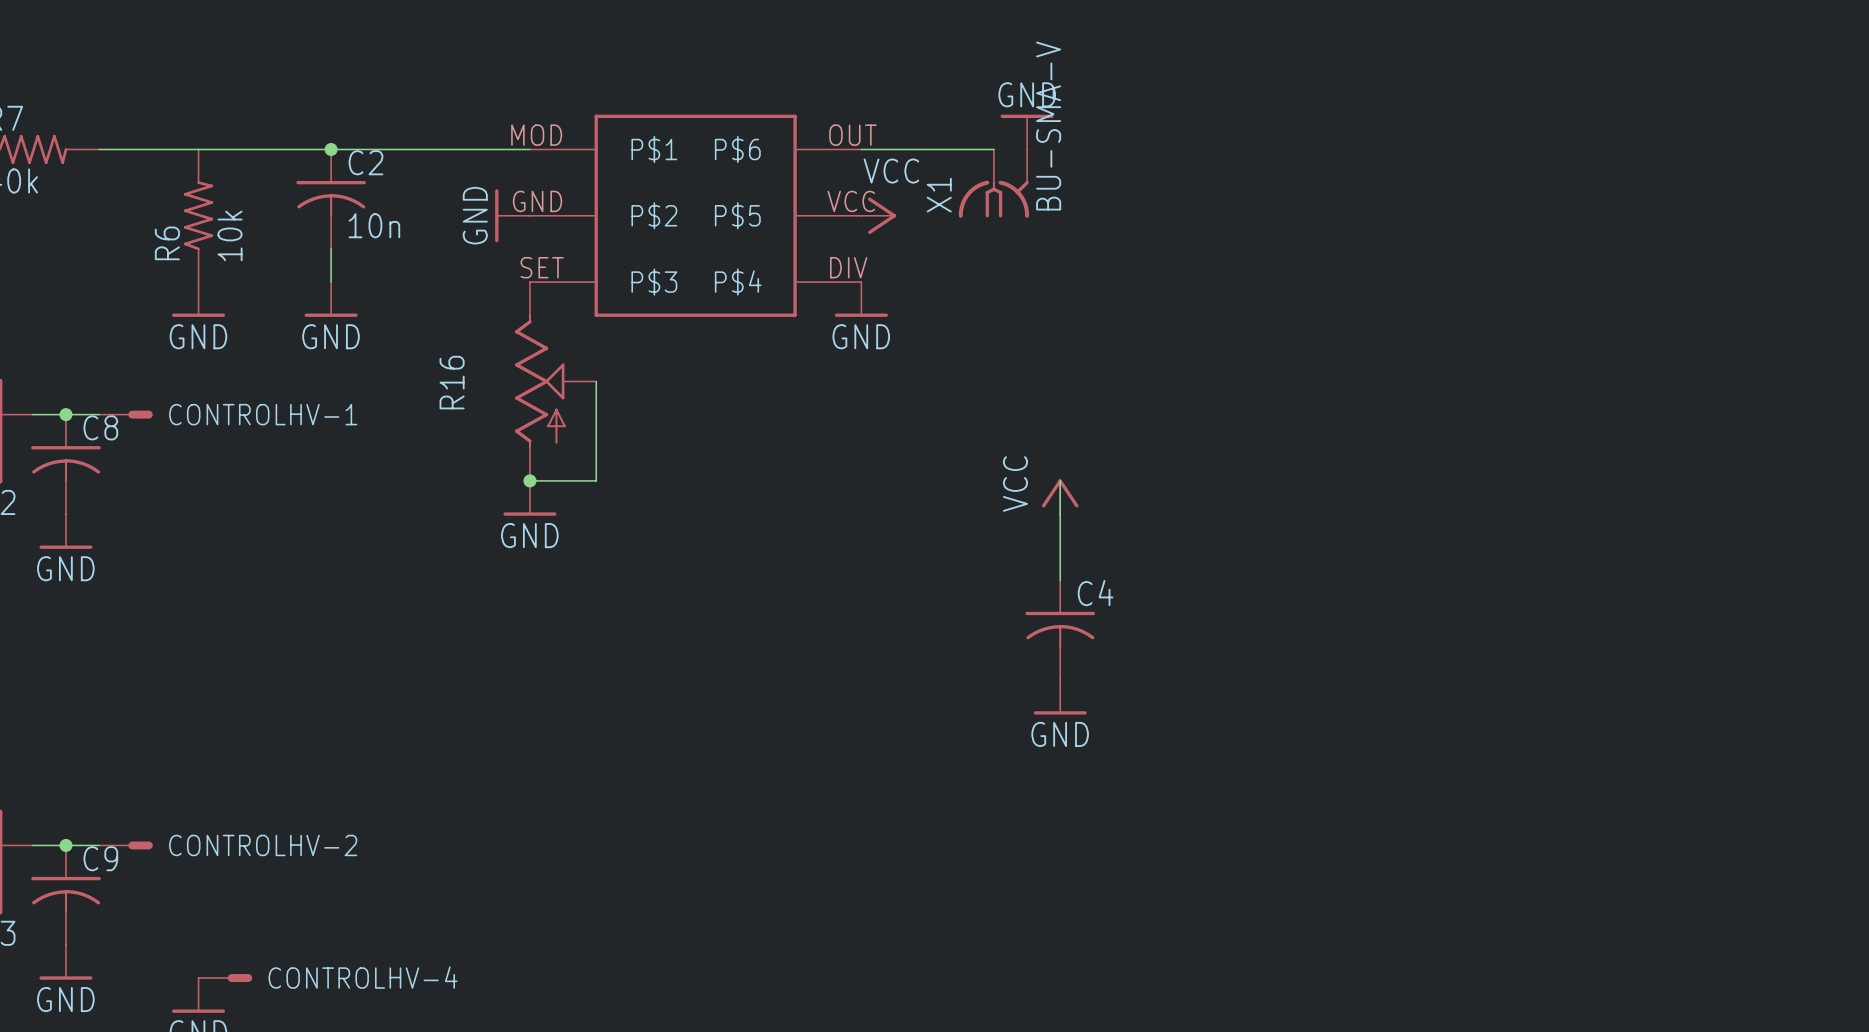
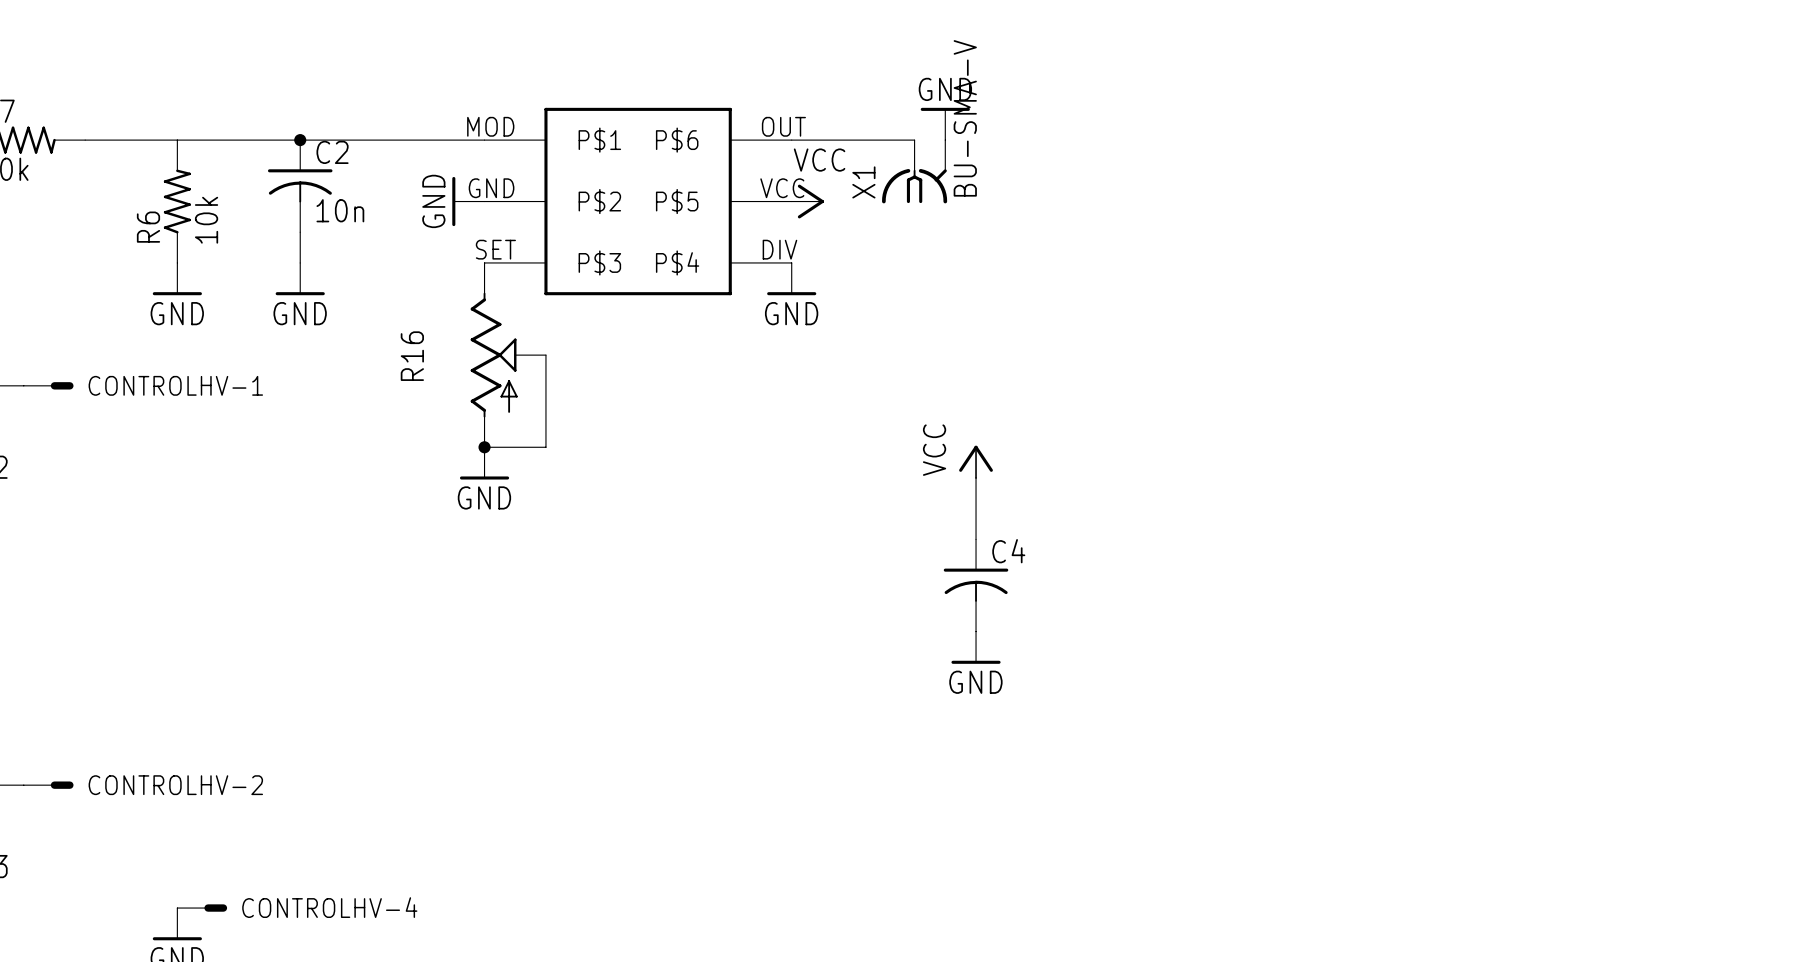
junction: (65, 414) -> none
CONTROLHV-1 position: (125, 414) -> (48, 385)
C8: (65, 464) -> none
power symbol: GND (65, 531) -> none
junction: (65, 845) -> none
CONTROLHV-2 position: (125, 845) -> (48, 785)
C9: (65, 895) -> none
power symbol: GND (65, 962) -> none

